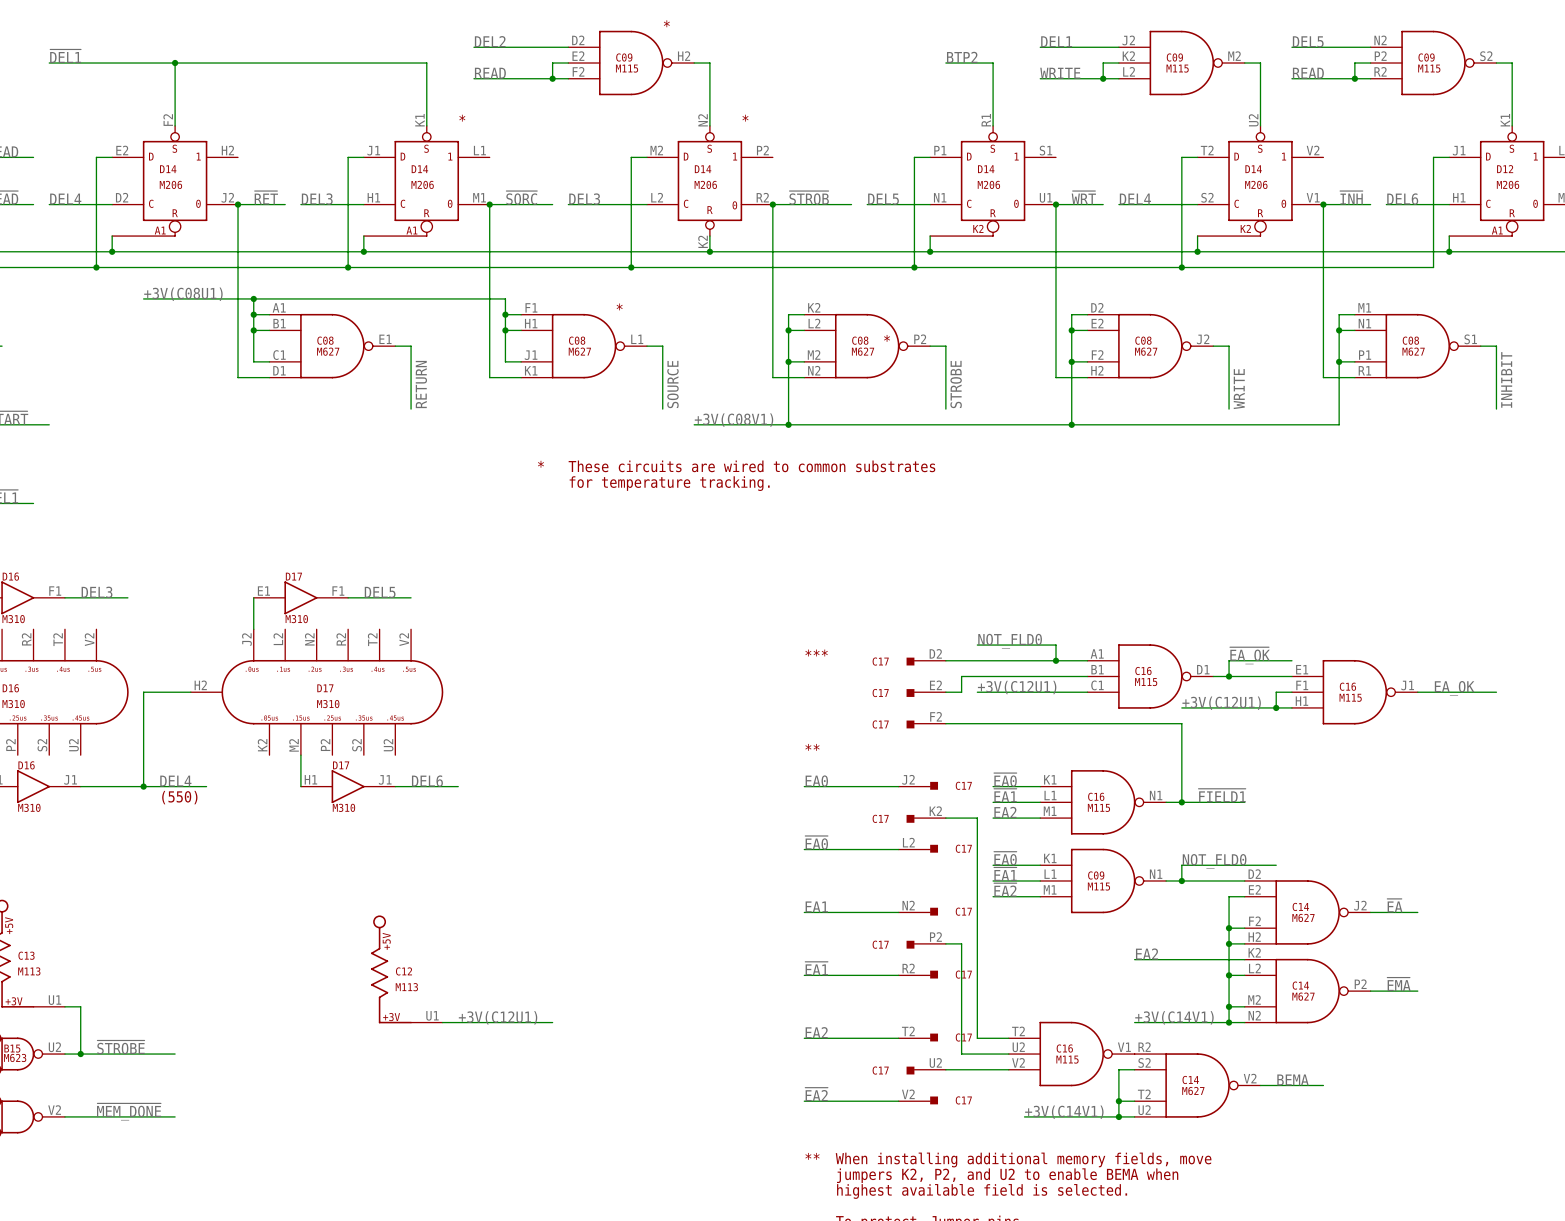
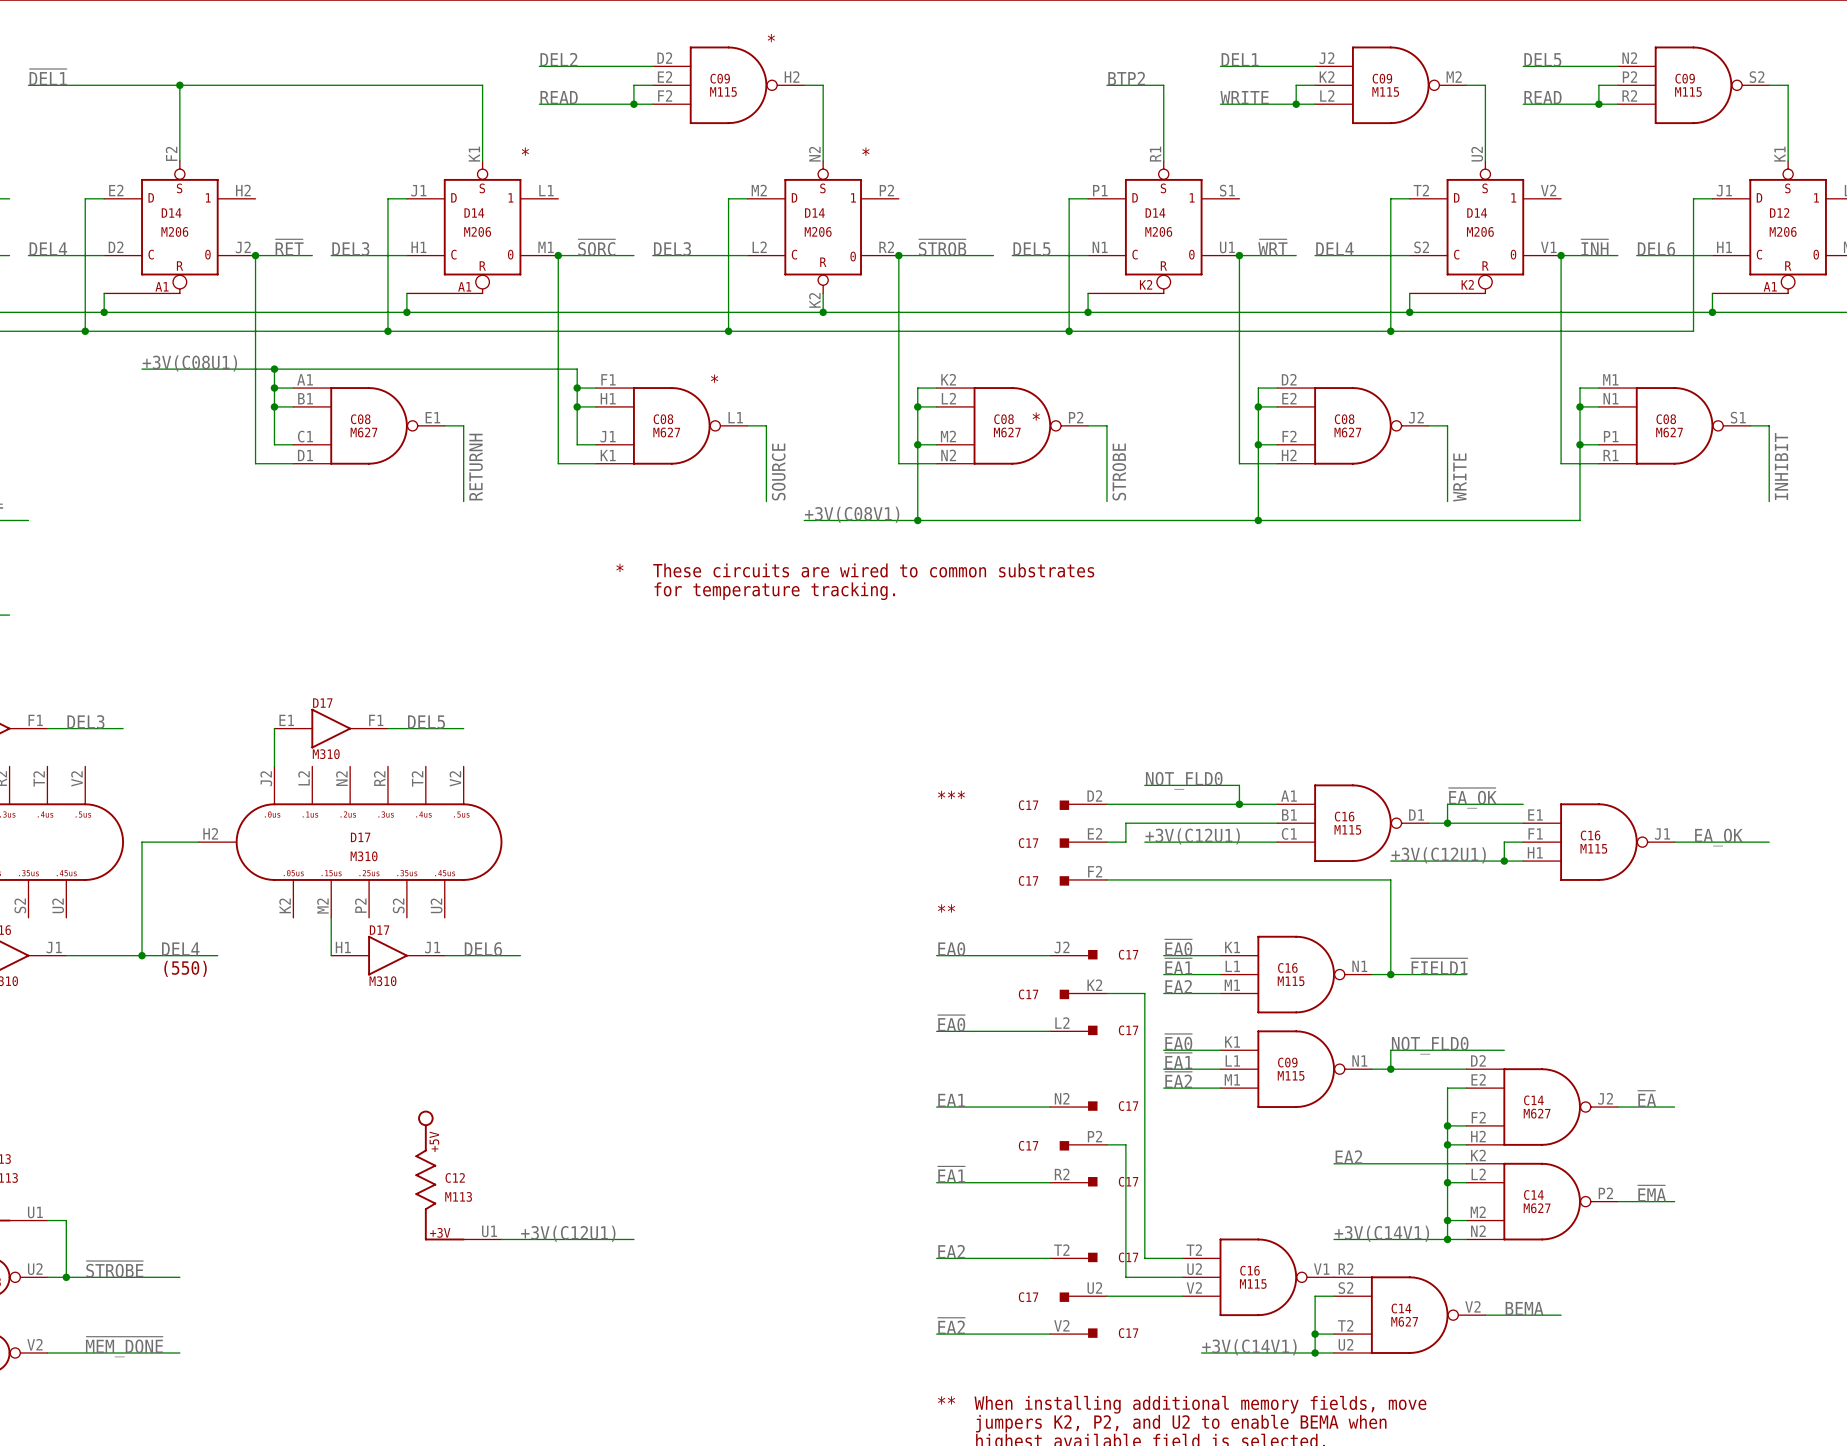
label: RETURN (421, 384) -> RETURNH (476, 467)

